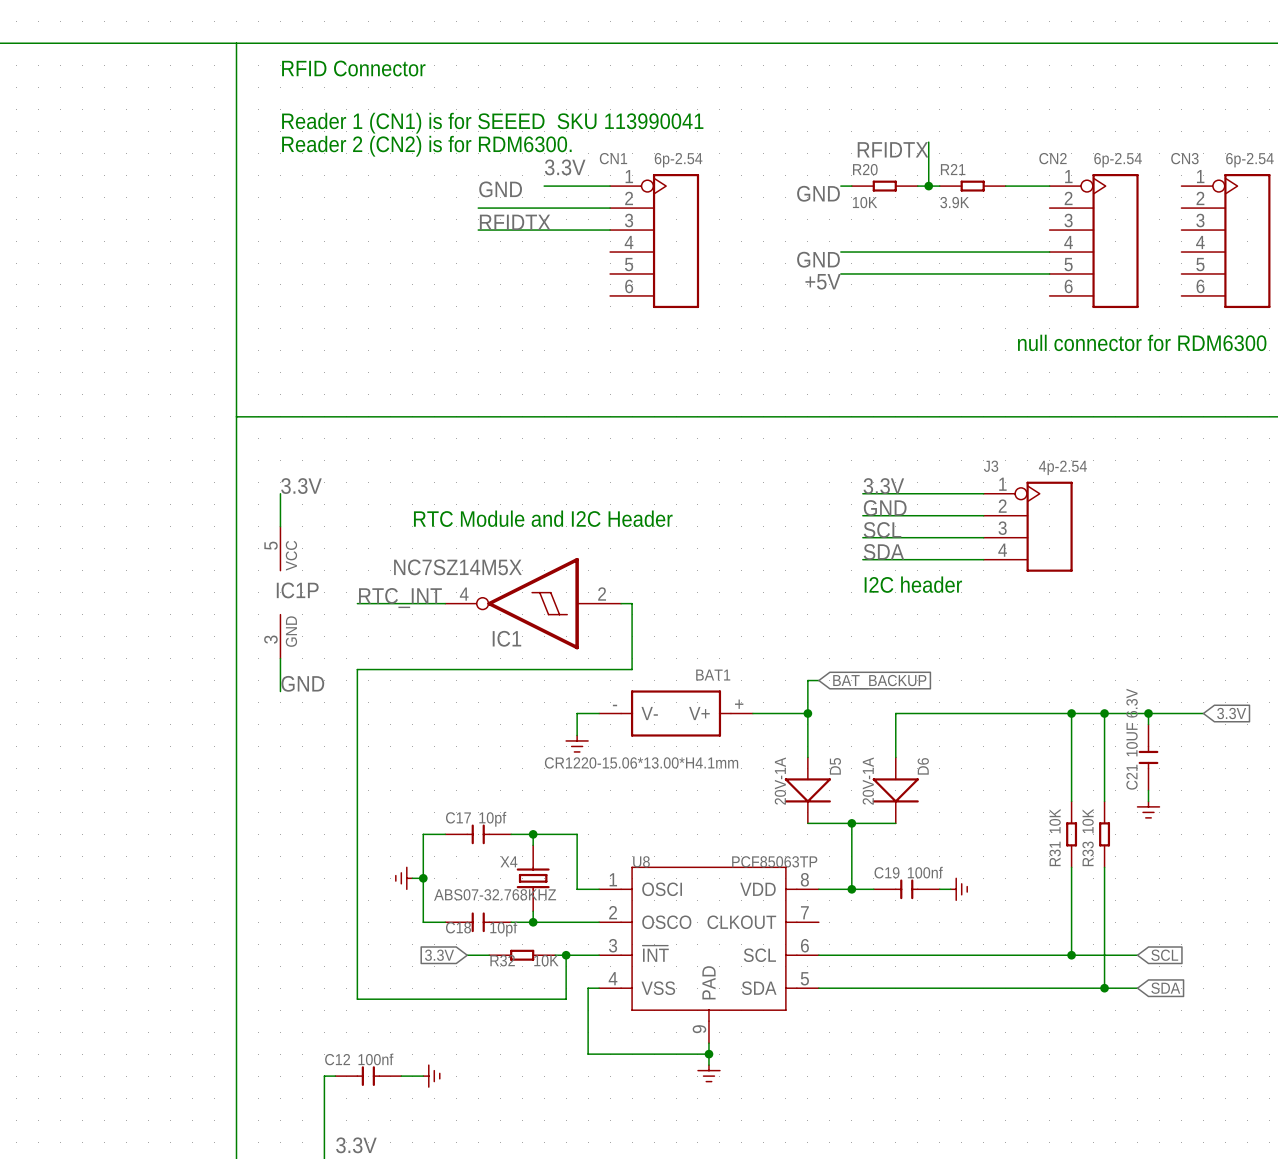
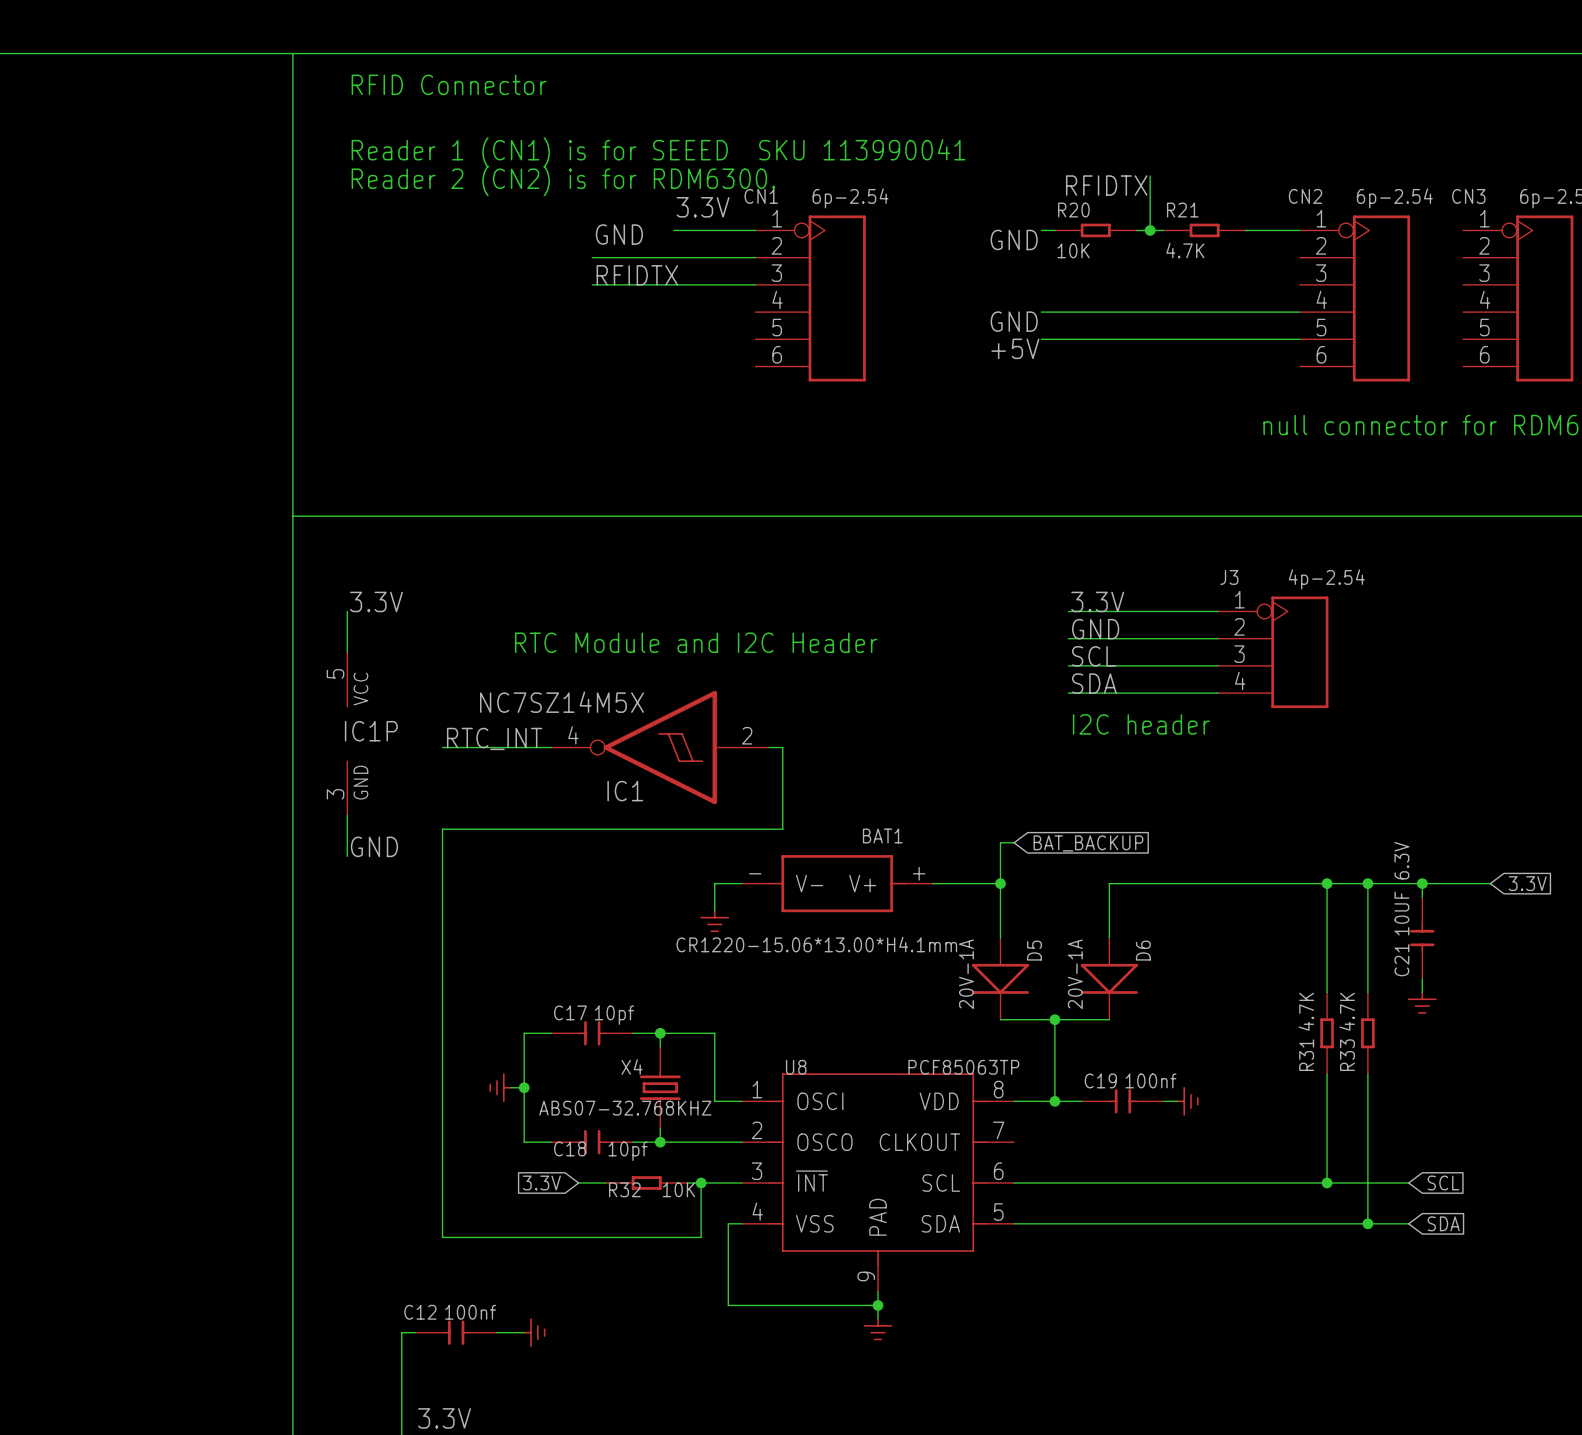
R21 value: 3.9K (954, 202) -> 4.7K (1185, 250)
R31 value: 10K (1055, 821) -> 4.7K (1306, 1011)
R33 value: 10K (1088, 821) -> 4.7K (1347, 1011)

